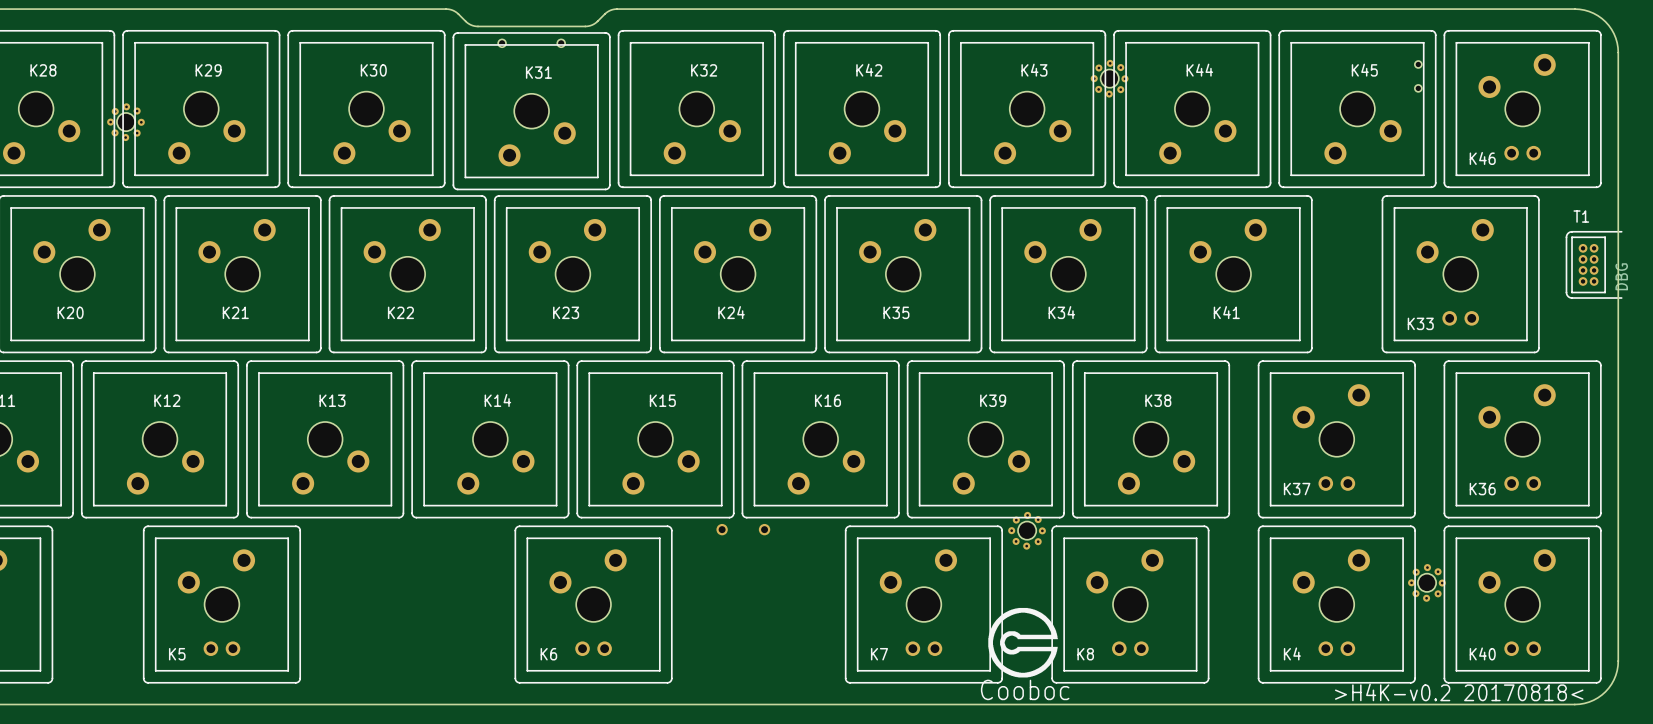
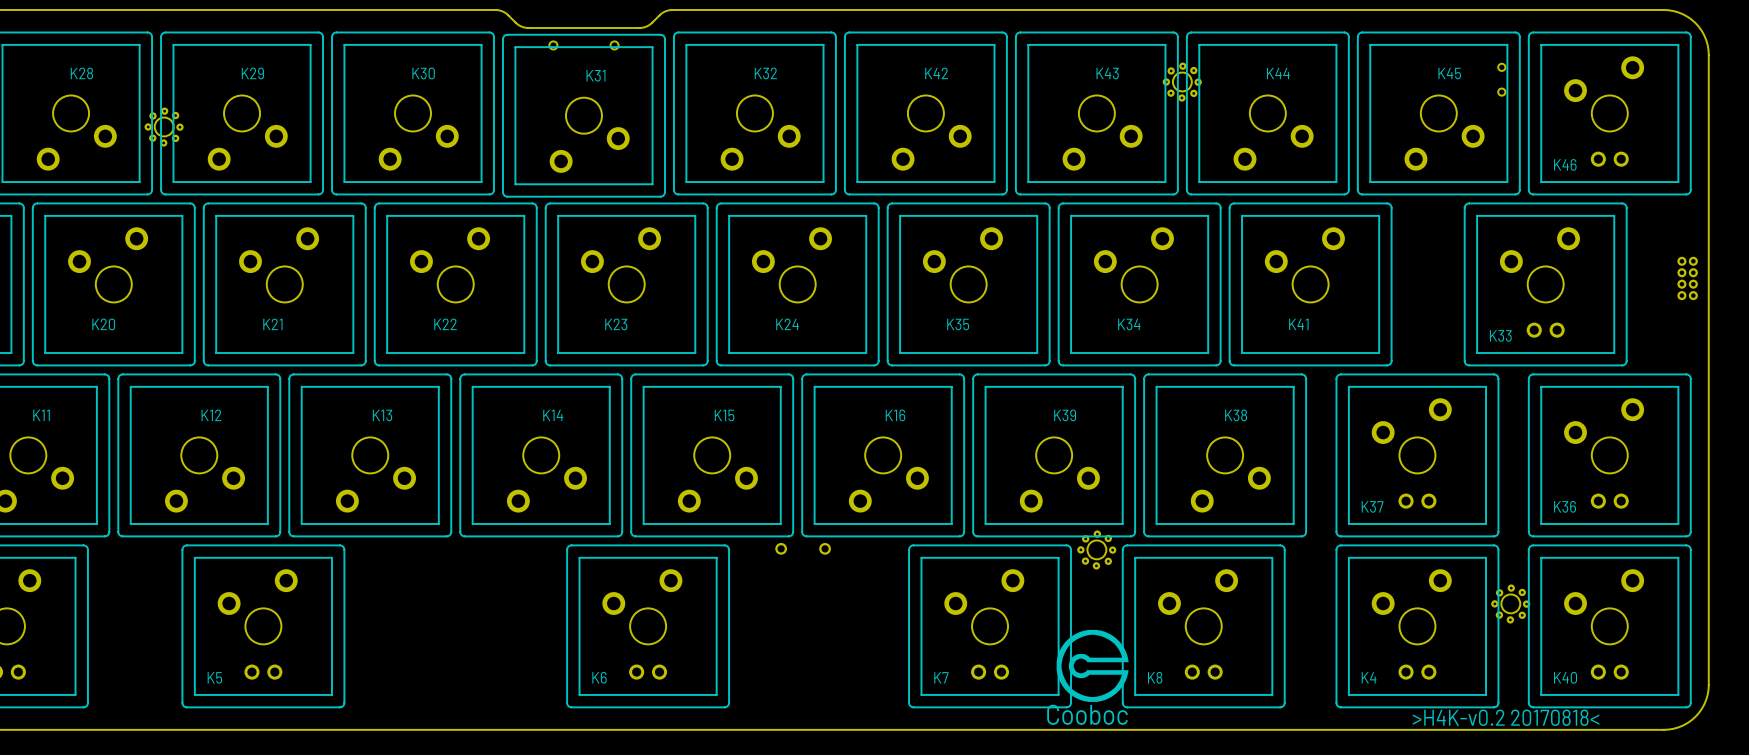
T1 side: top (1594, 264) -> bottom (1687, 278)

